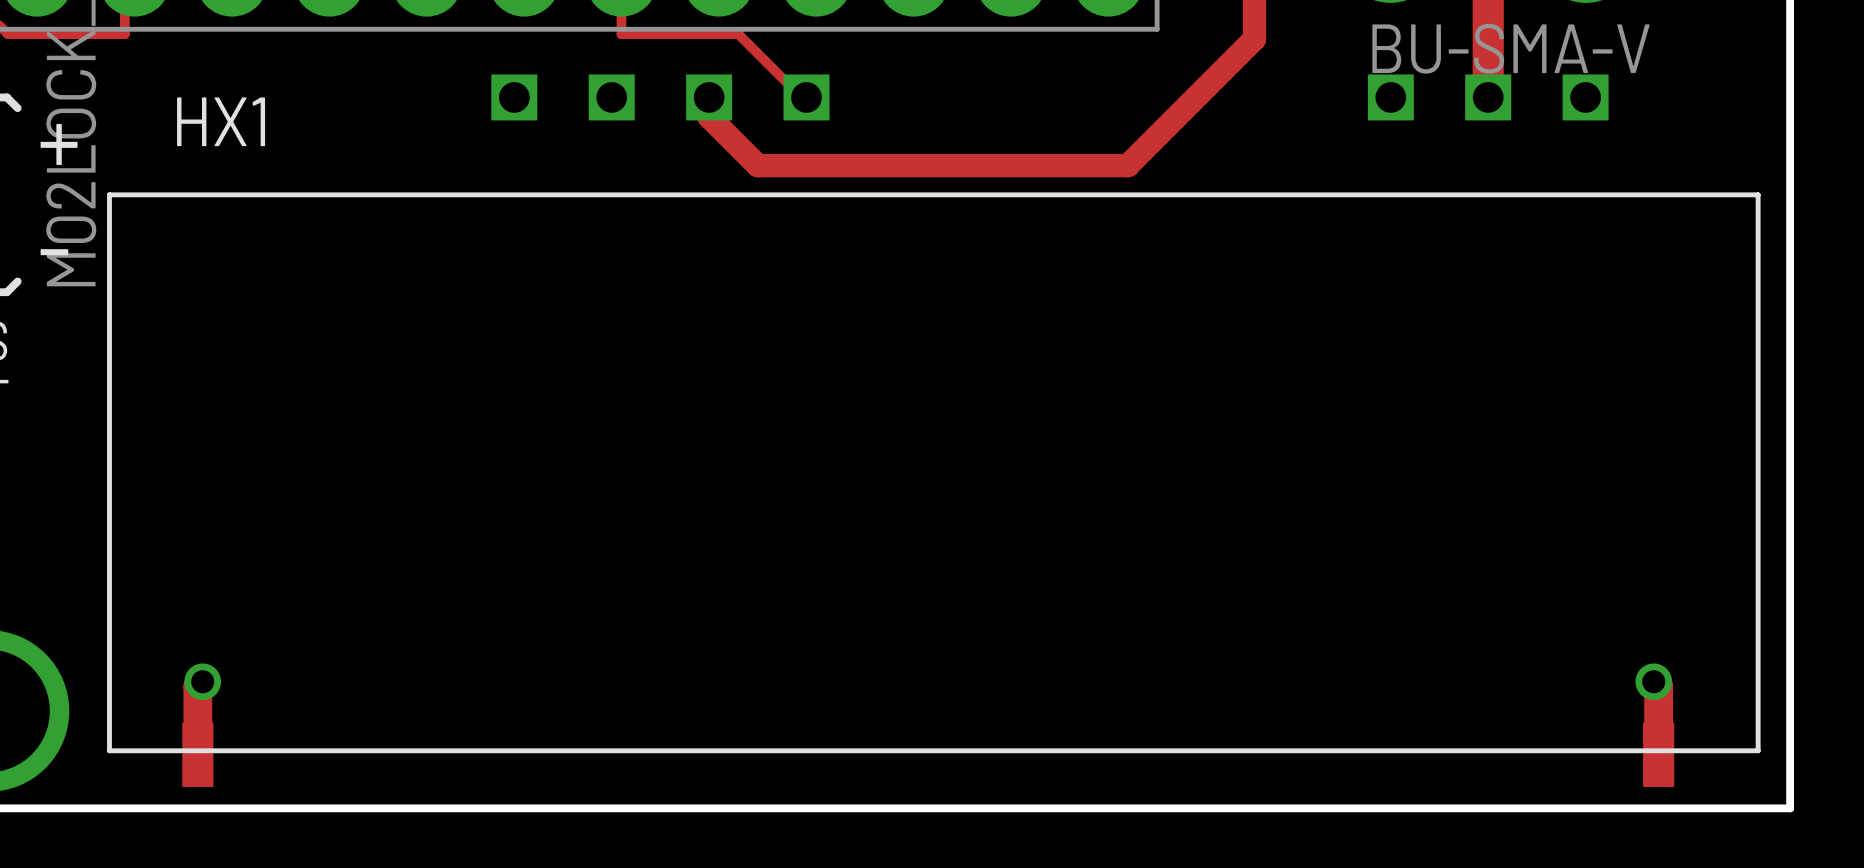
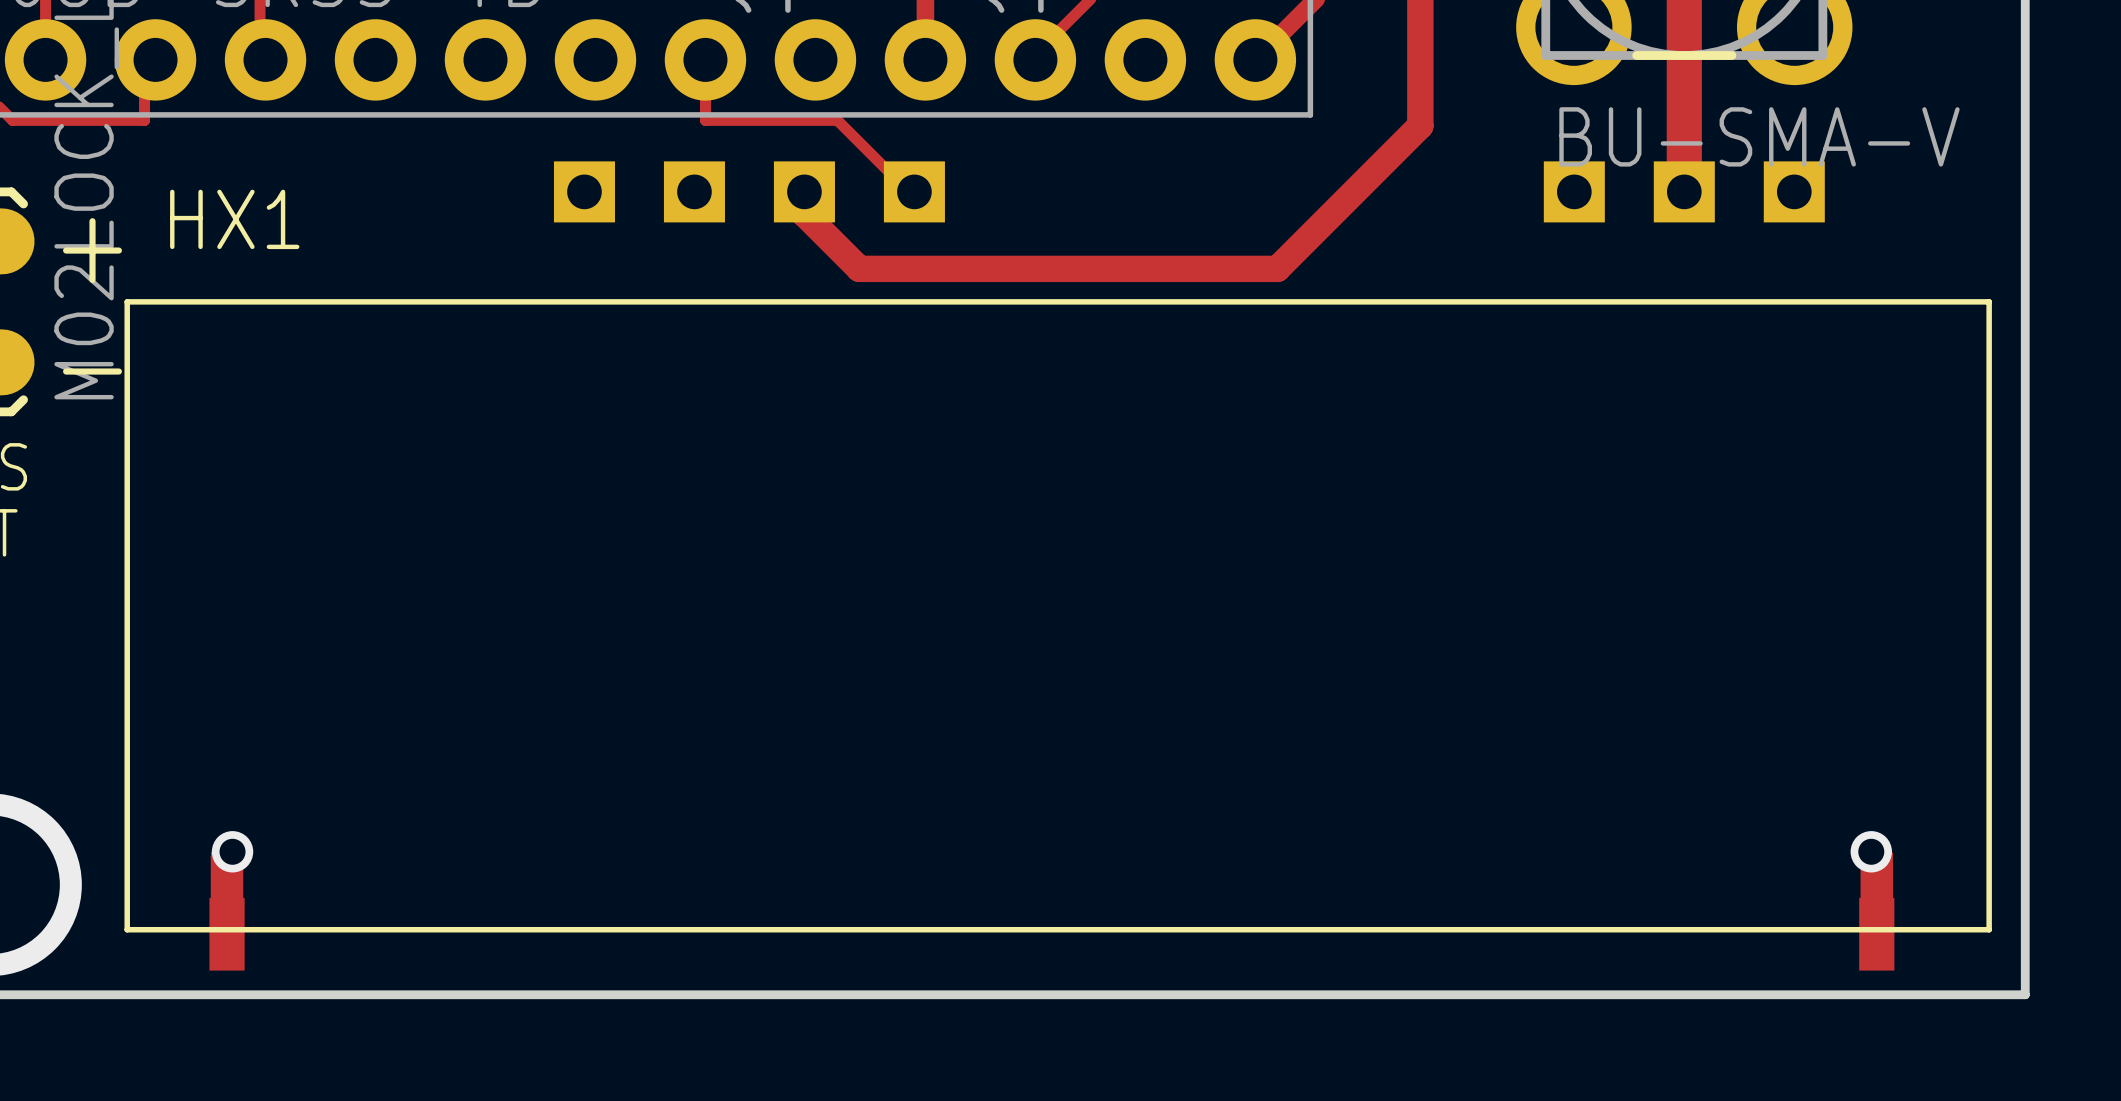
part footprint: [107, 74, 1761, 787] -> [124, 161, 1992, 971]

